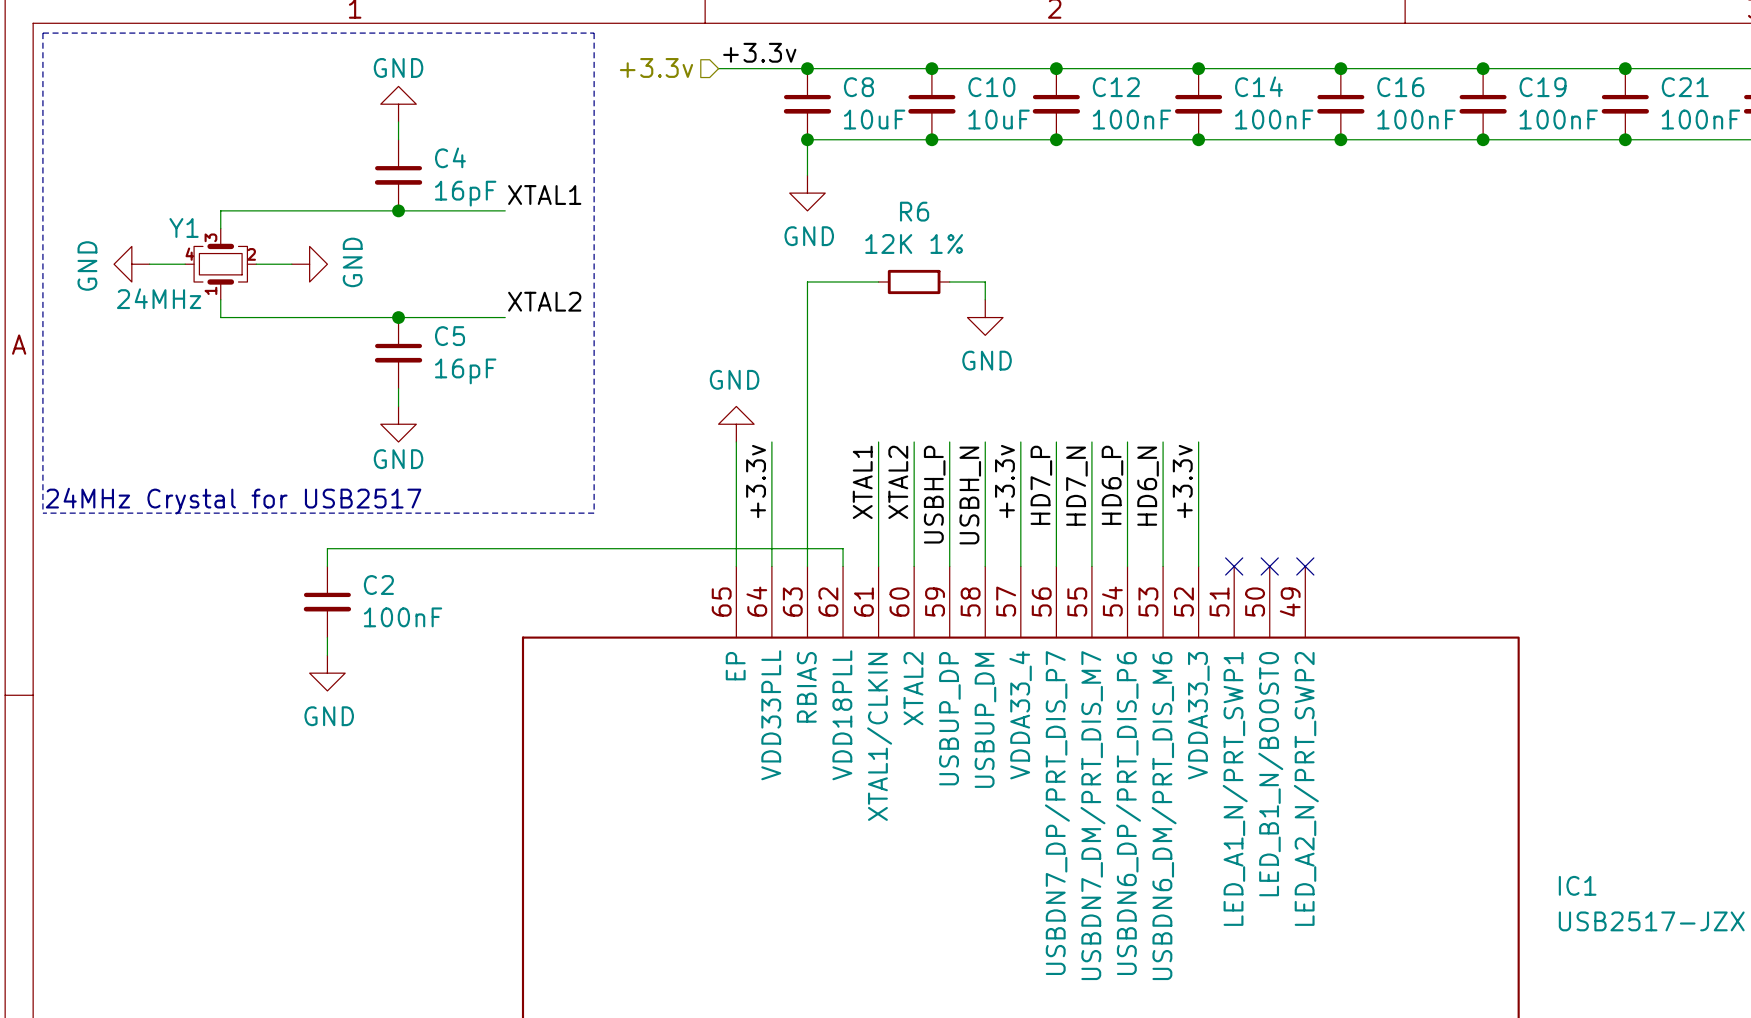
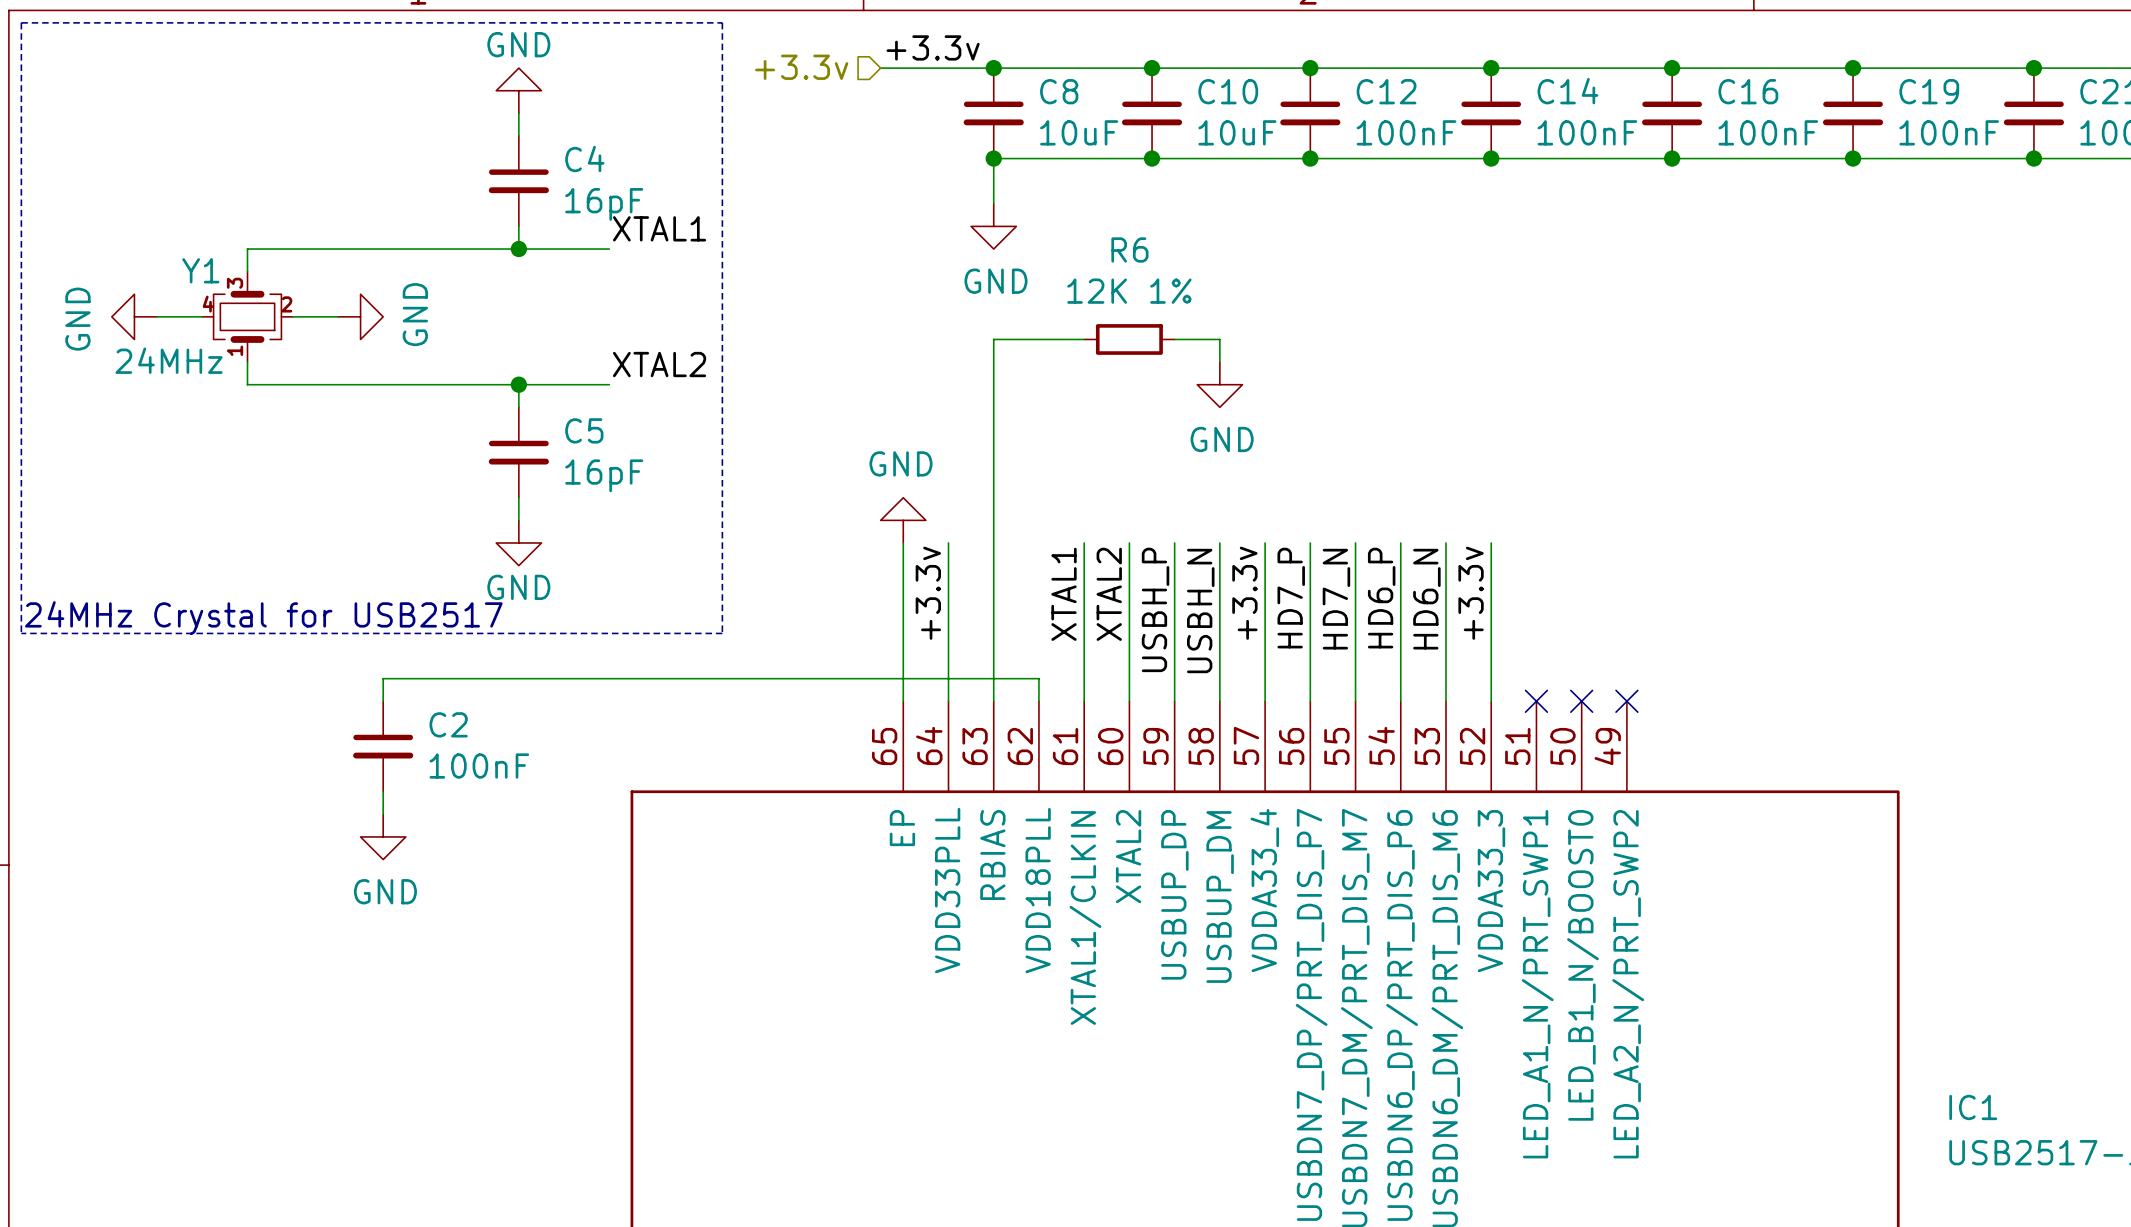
power symbol position: GND (398, 104) -> GND (518, 90)
wire: (398, 121) (398, 139) -> (518, 113) (518, 135)
C4 position: (398, 175) -> (518, 181)
wire: none -> (518, 226) (518, 249)
junction position: (398, 210) -> (518, 249)
junction position: (398, 317) -> (518, 384)
wire: none -> (518, 384) (518, 407)
C5 position: (398, 353) -> (518, 452)
wire: (398, 388) (398, 406) -> (518, 497) (518, 520)
power symbol position: GND (398, 424) -> GND (518, 542)

